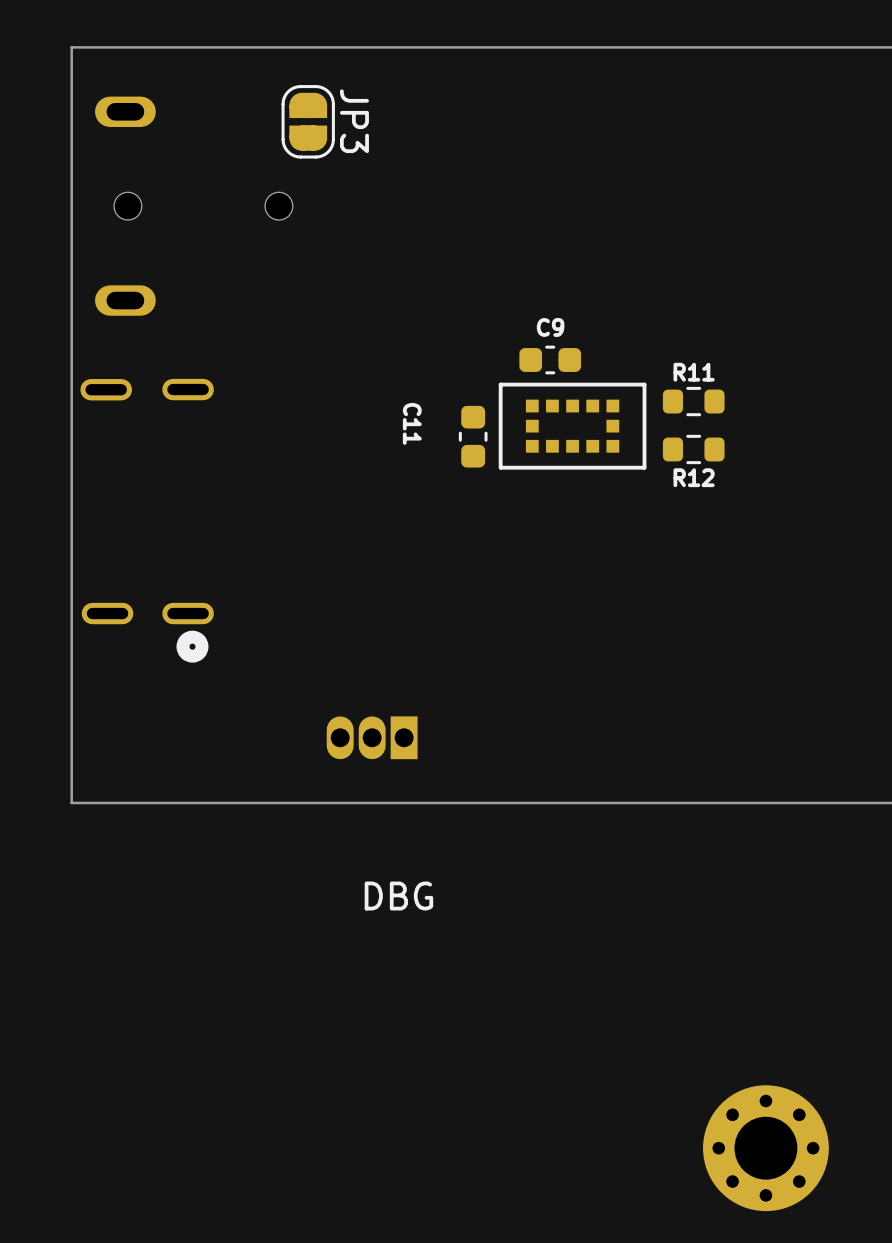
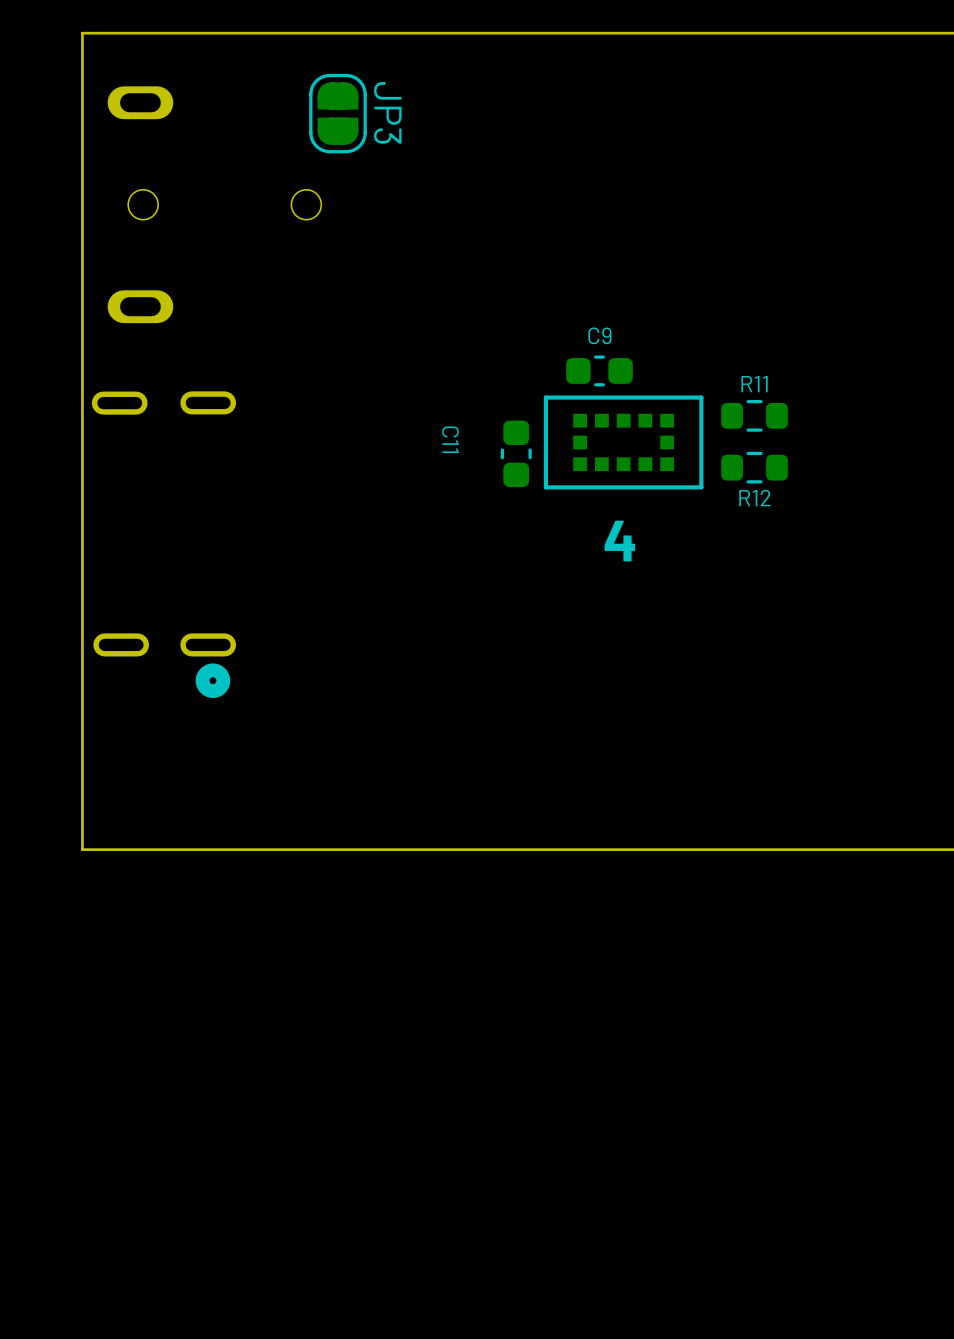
text: none -> 4 (619, 541)
part: (372, 737) -> none
text: DBG (398, 896) -> none
part: (765, 1148) -> none

